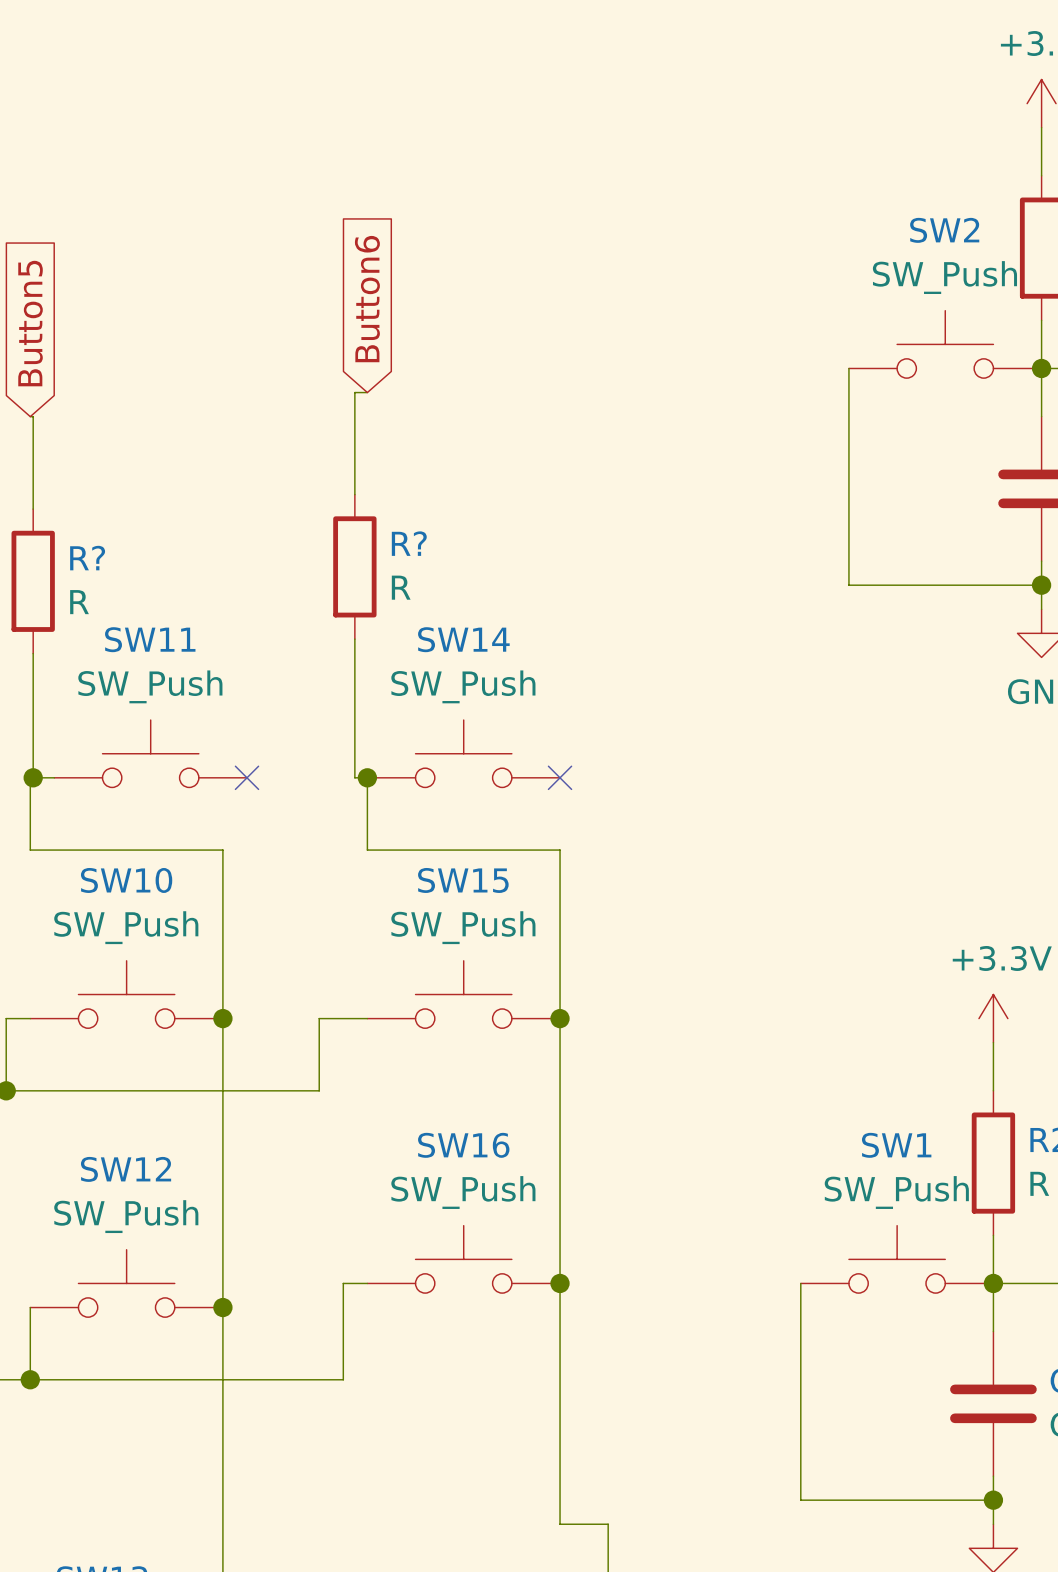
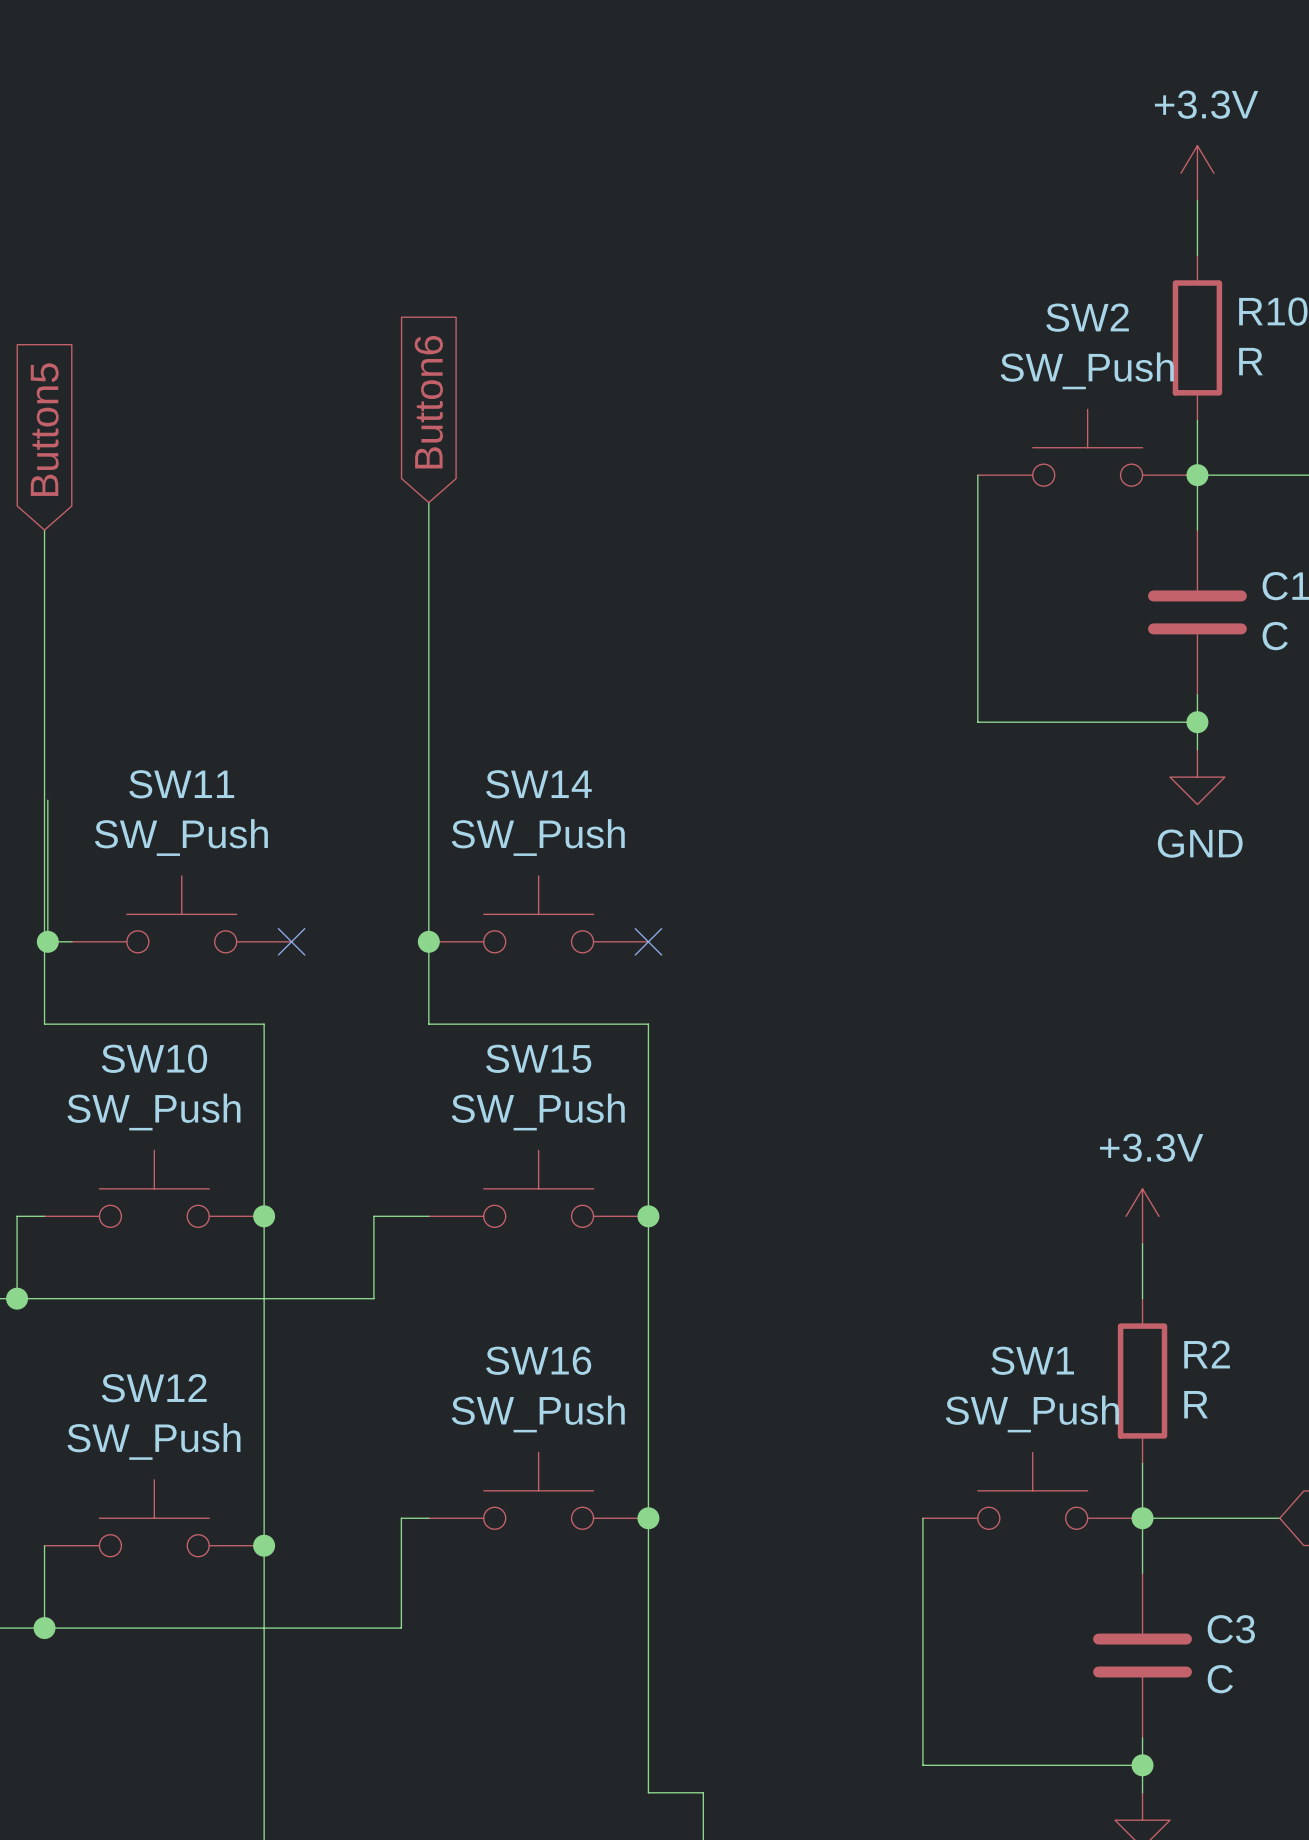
wire: (367, 392) (354, 392) (354, 494) -> none
wire: (30, 416) (33, 416) (33, 509) -> (44, 530) (44, 941)
R?: R (354, 566) -> none
R?: R (33, 581) -> none
wire: (354, 639) (354, 777) (367, 777) -> (428, 502) (428, 941)

